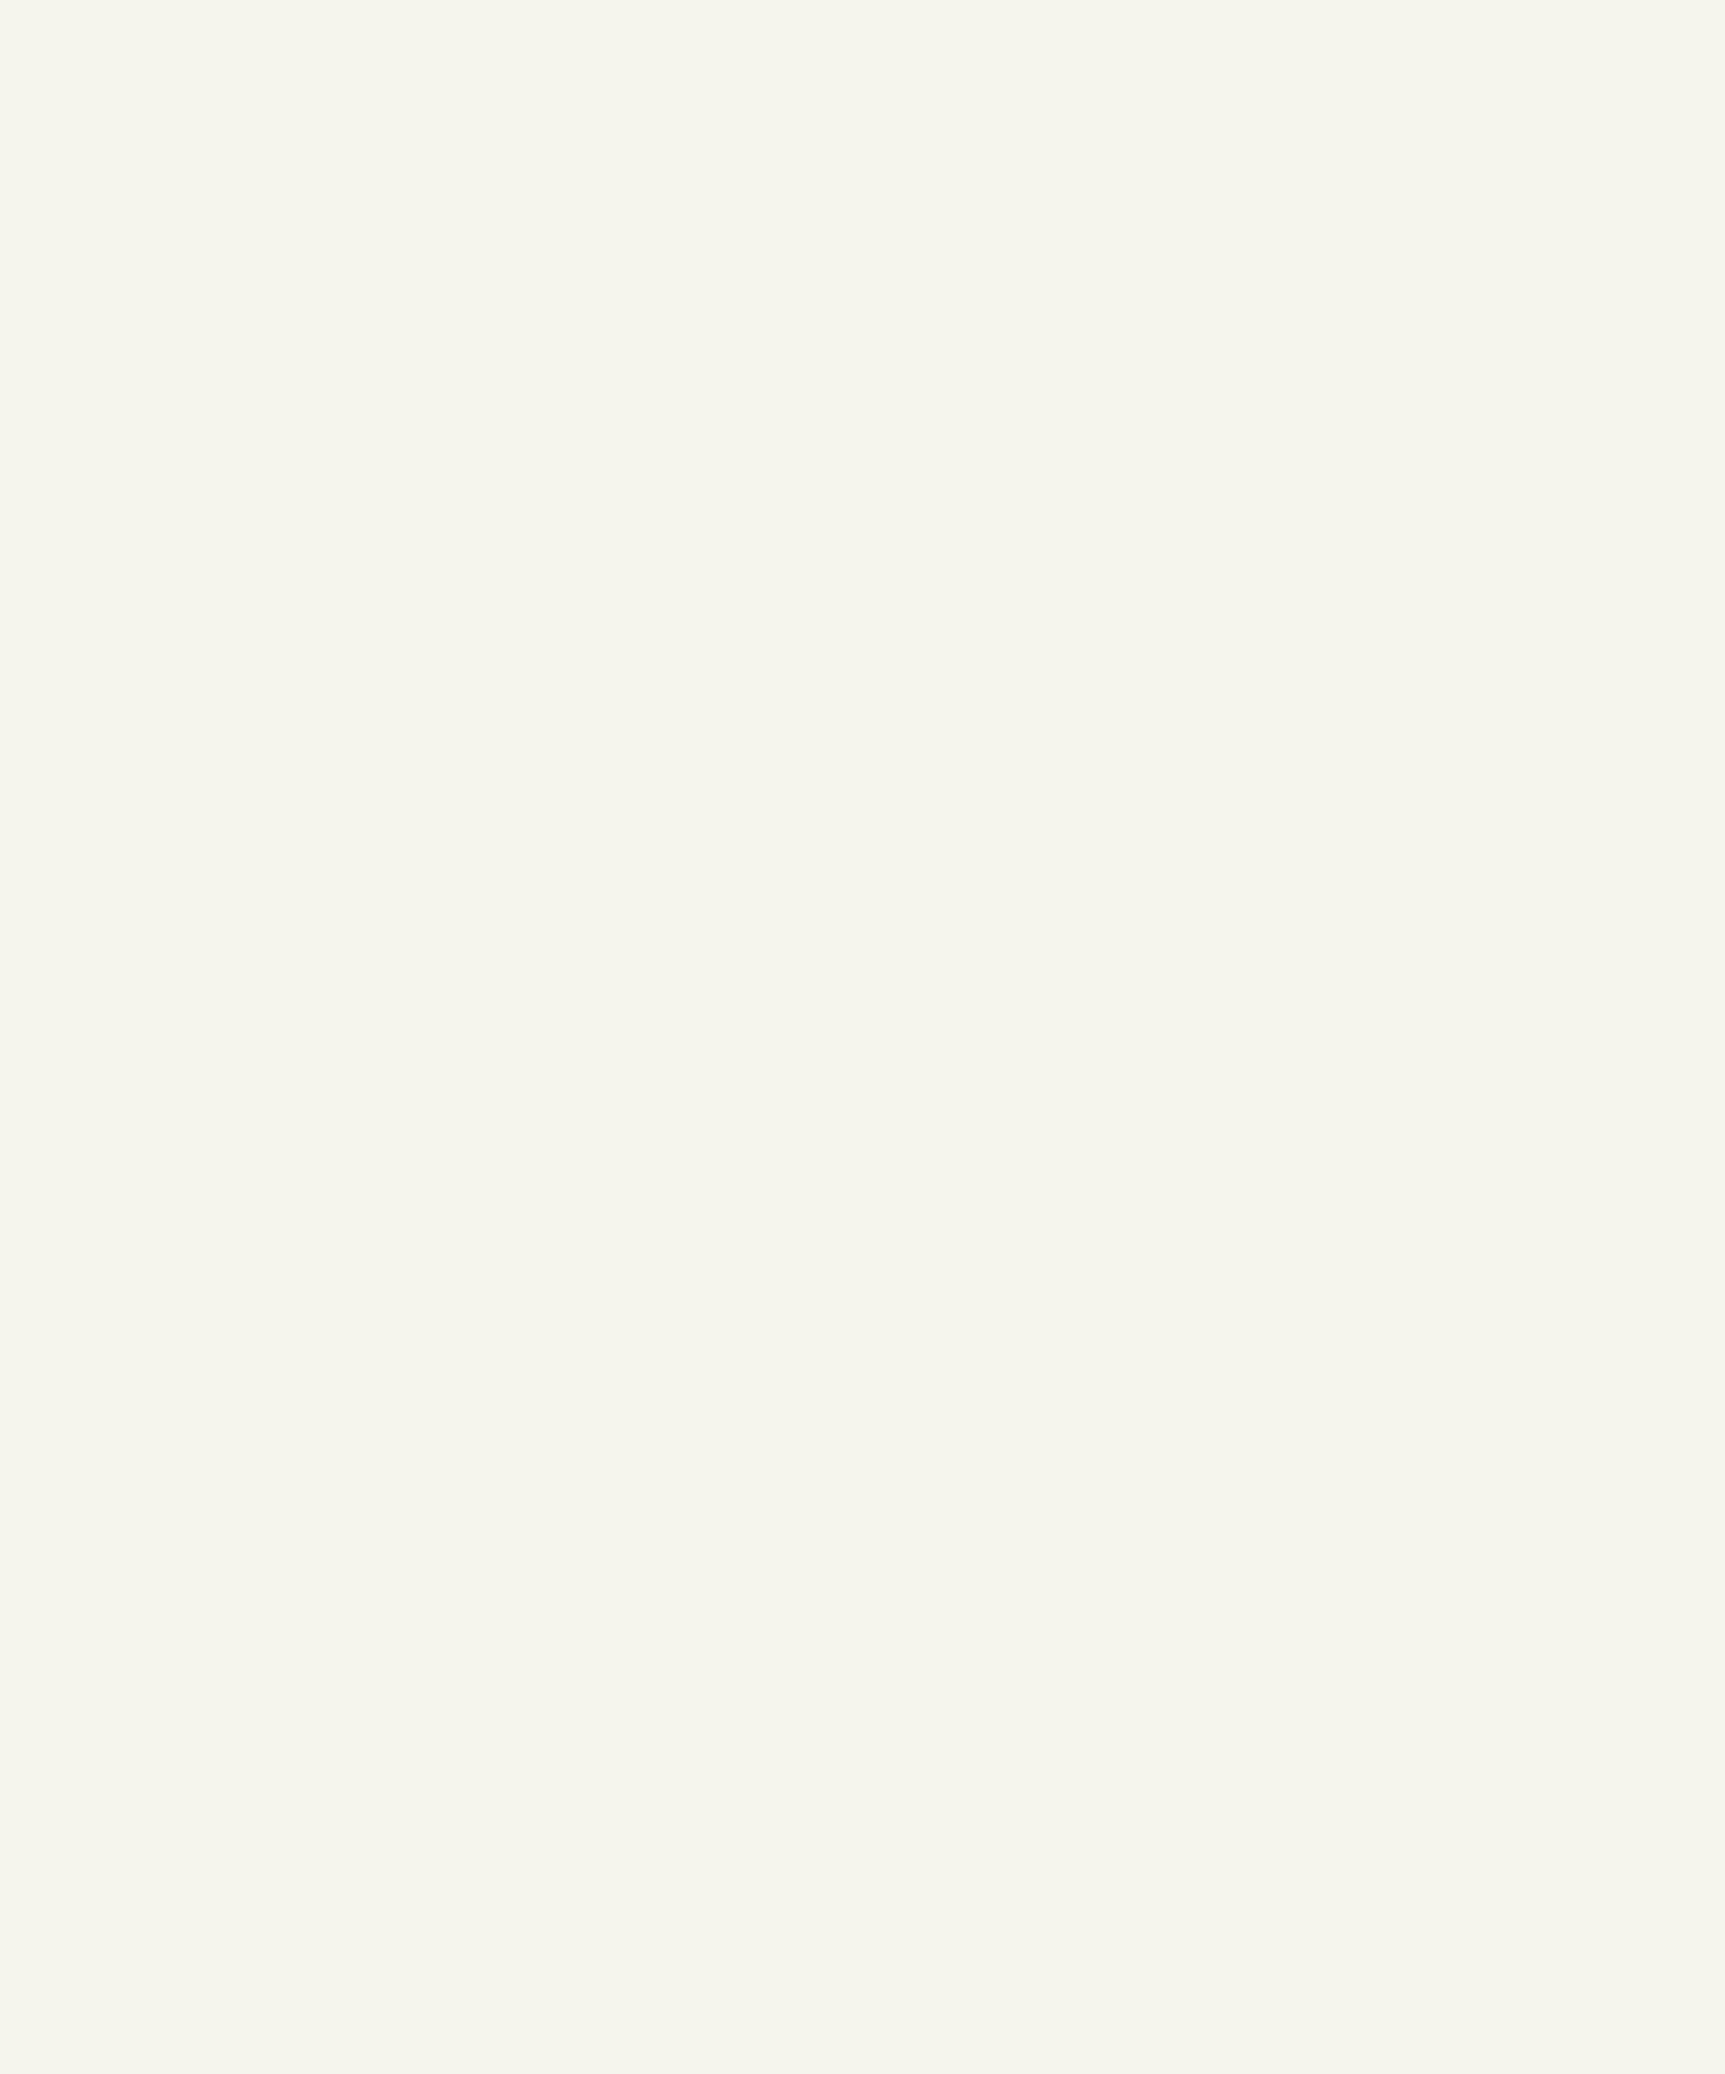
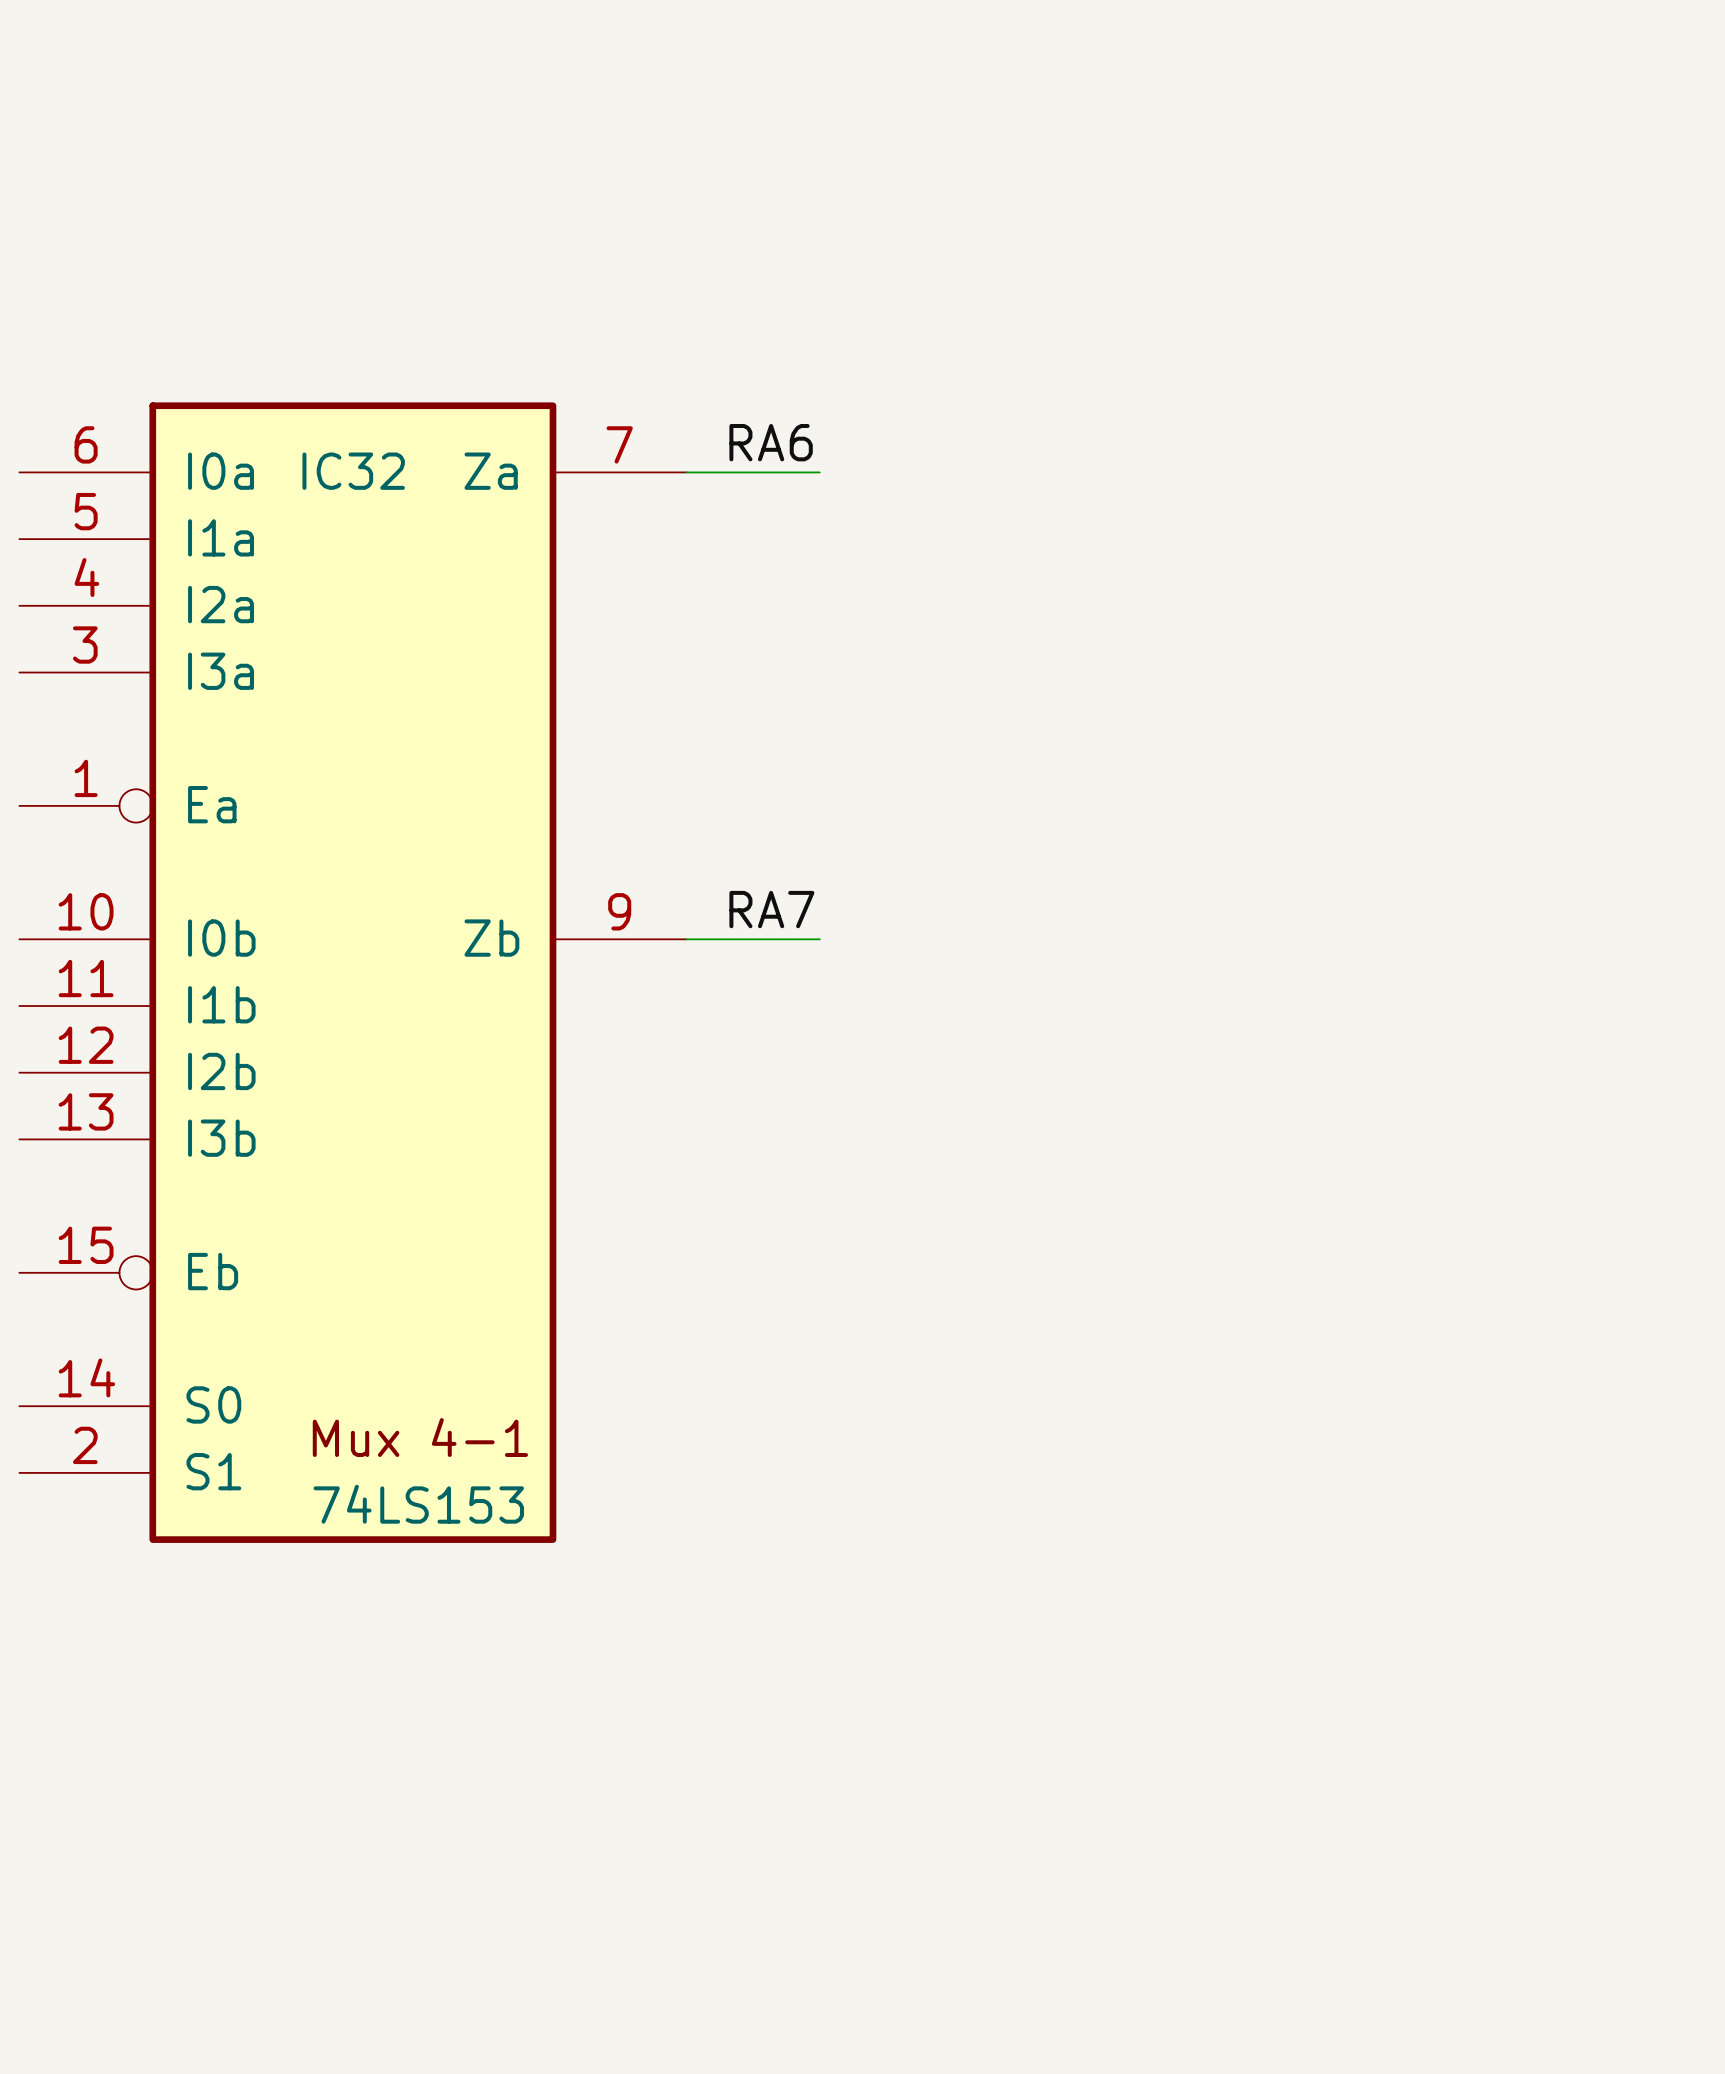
label: none -> RA6 (771, 442)
wire: none -> (686, 472) (819, 472)
label: none -> RA7 (771, 909)
wire: none -> (686, 939) (819, 939)
IC32: none -> 74LS153 (352, 972)

